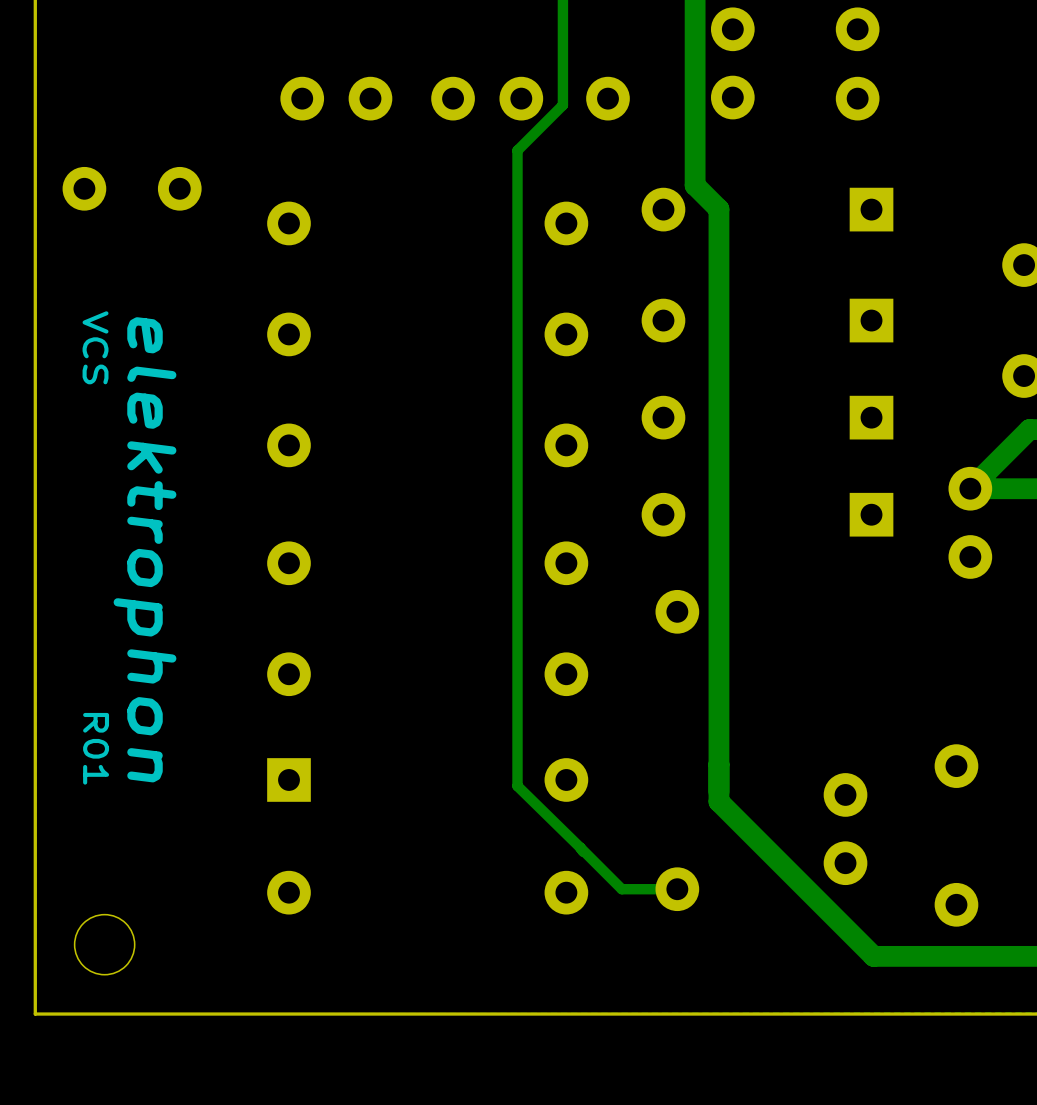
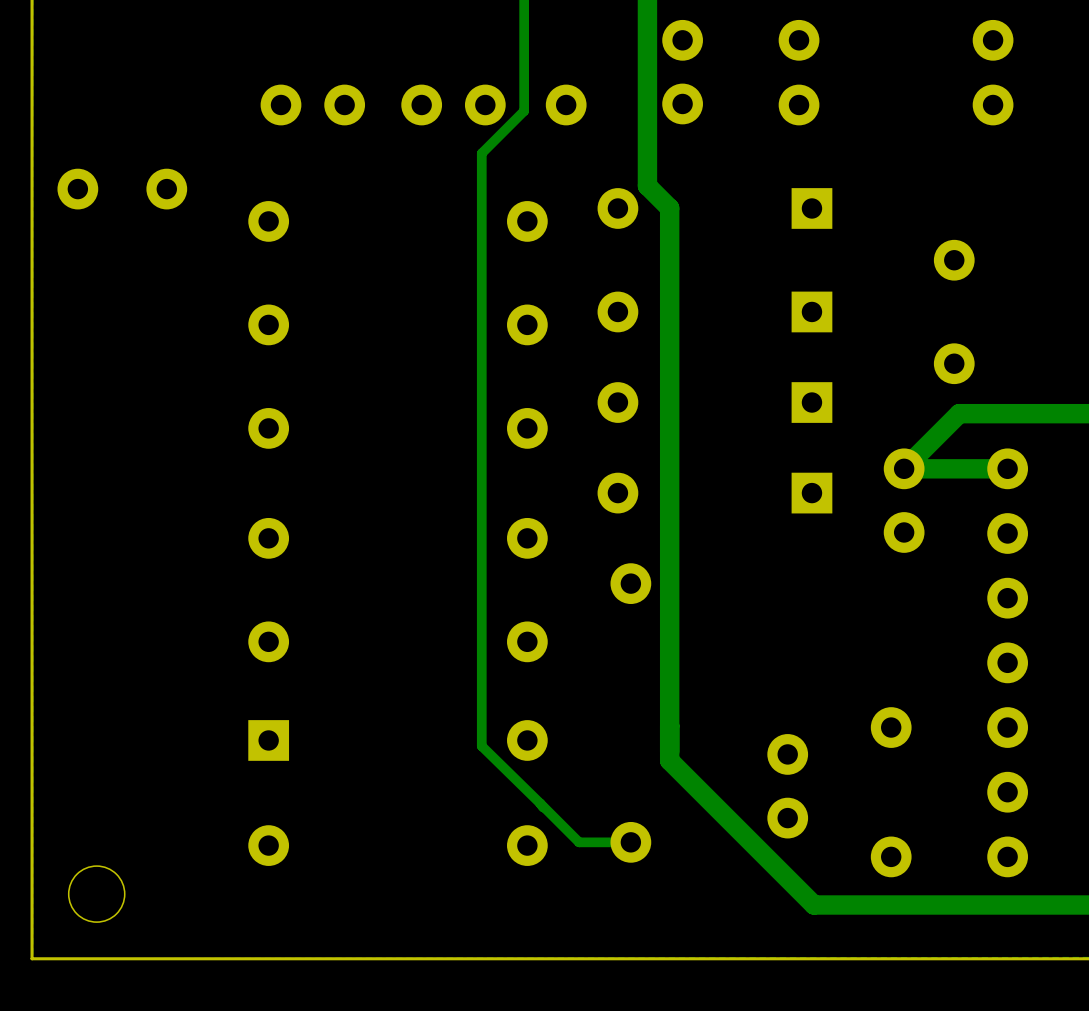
drawing: [82, 311, 177, 785] -> none

